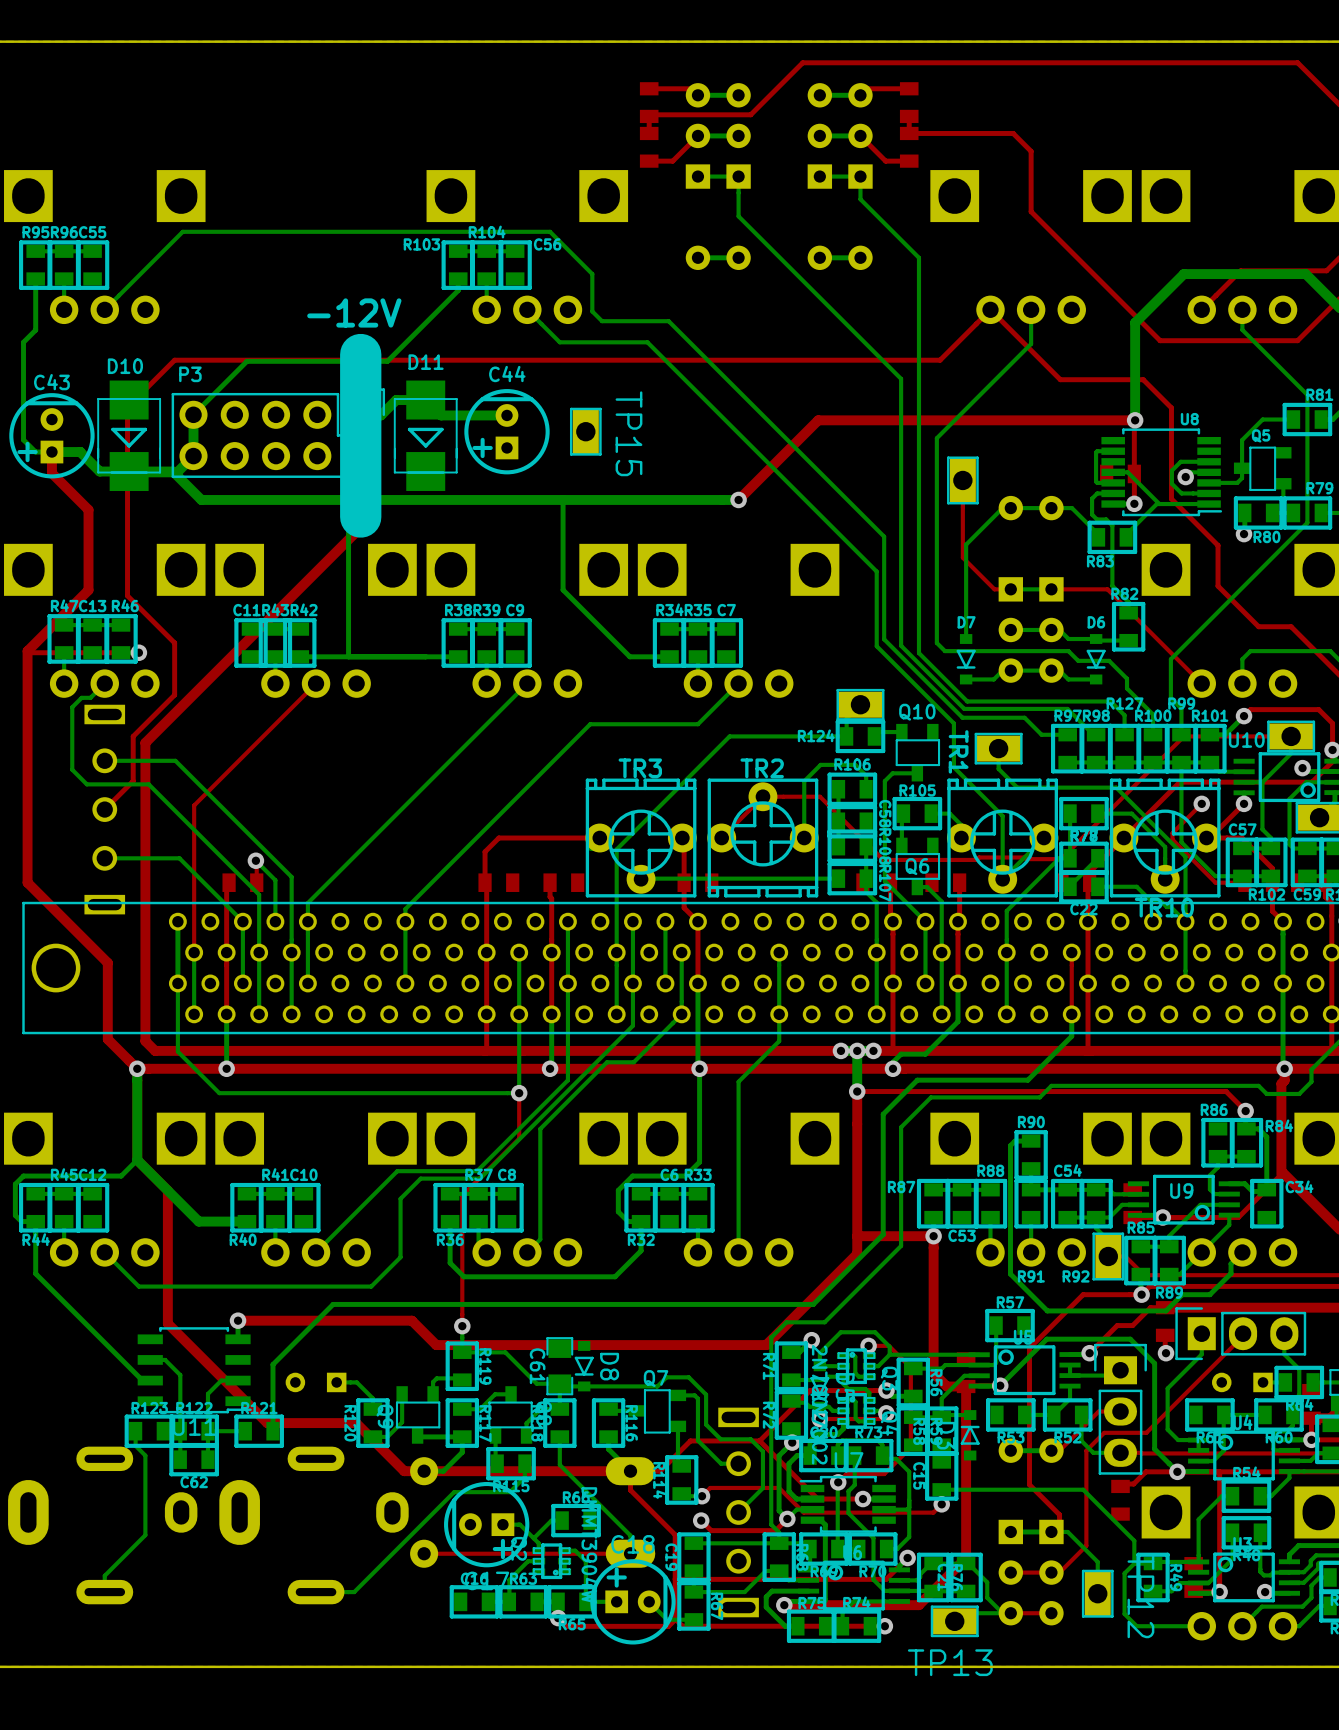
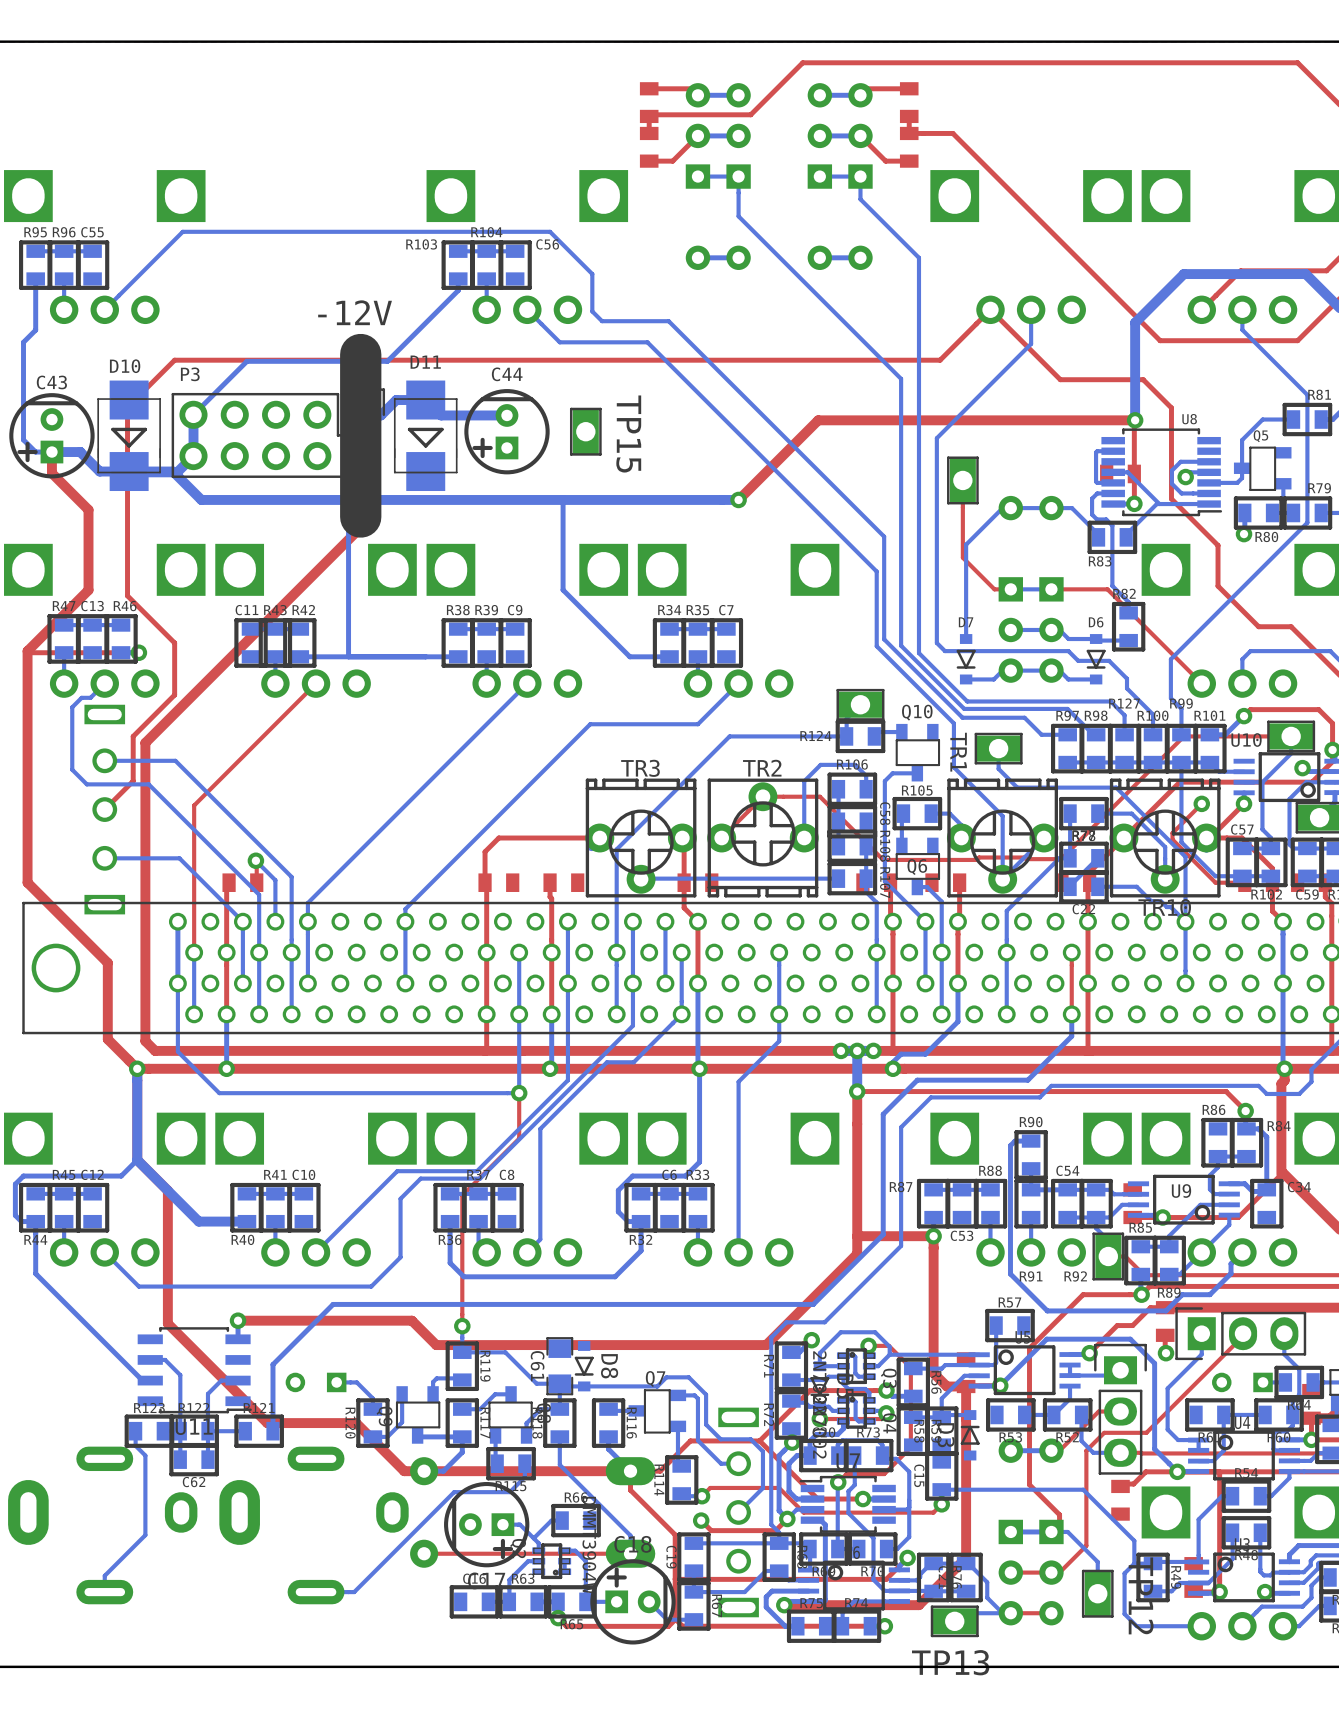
top track: (952, 133) (1013, 133) (1031, 151) (1031, 211) -> (952, 133) (1031, 211)

